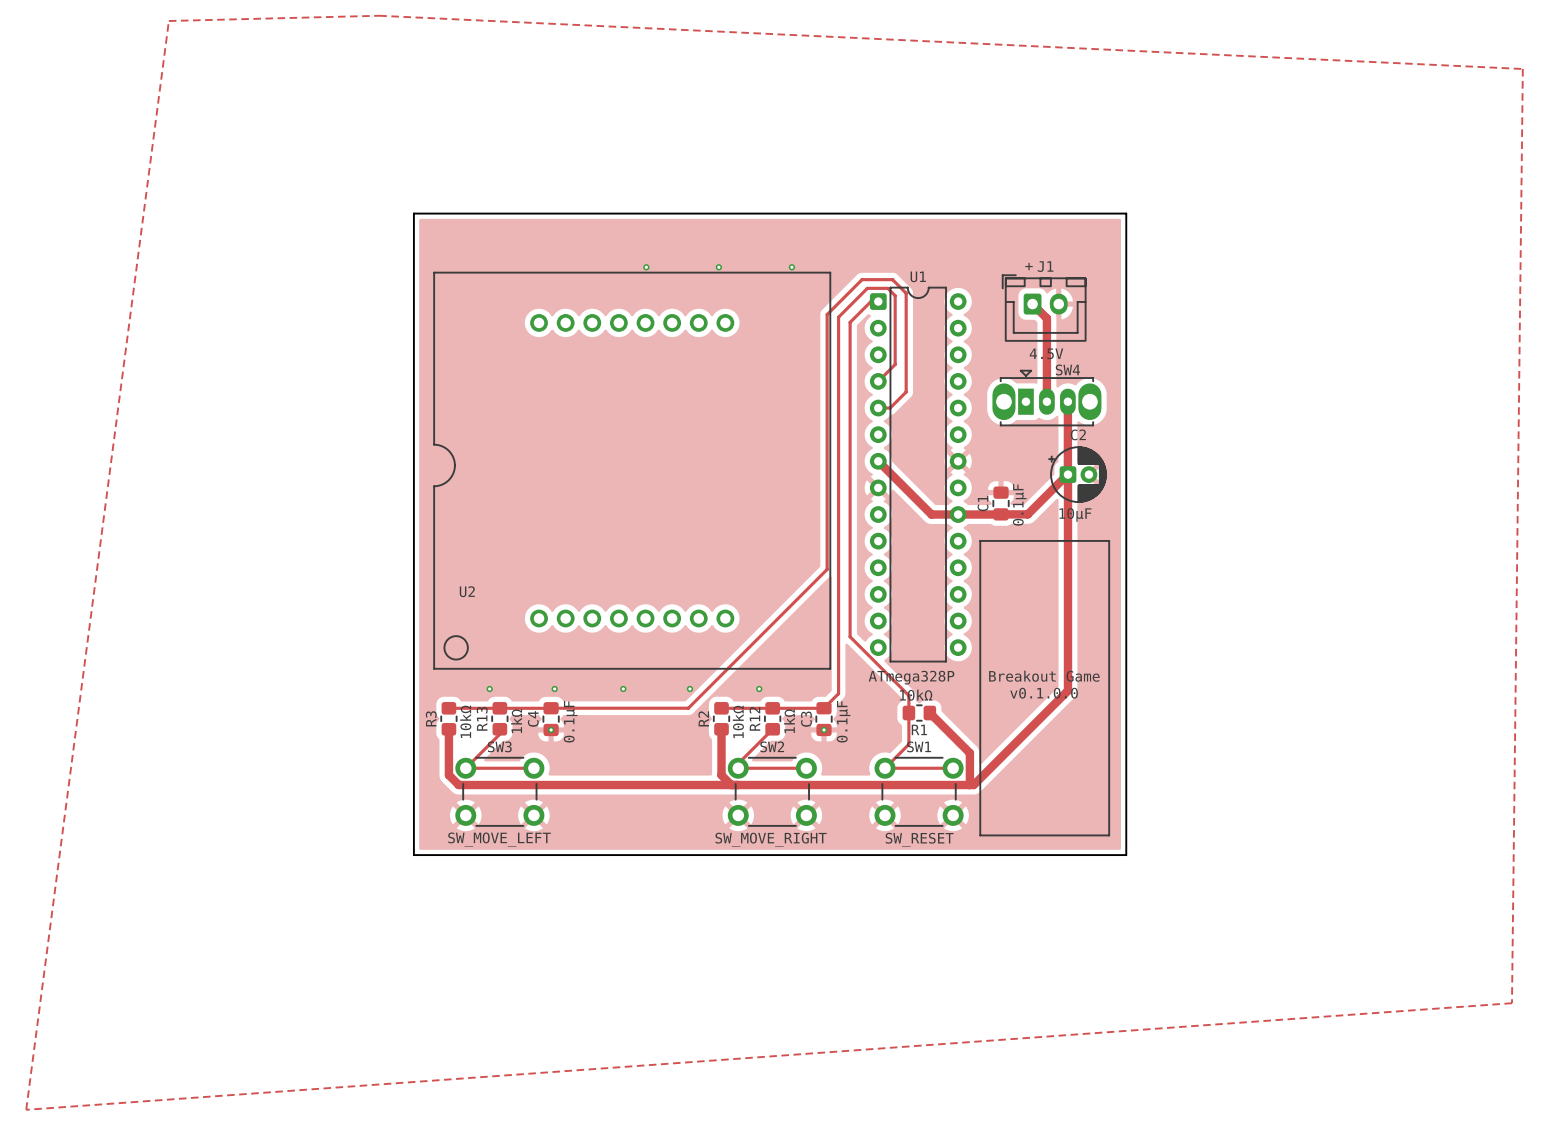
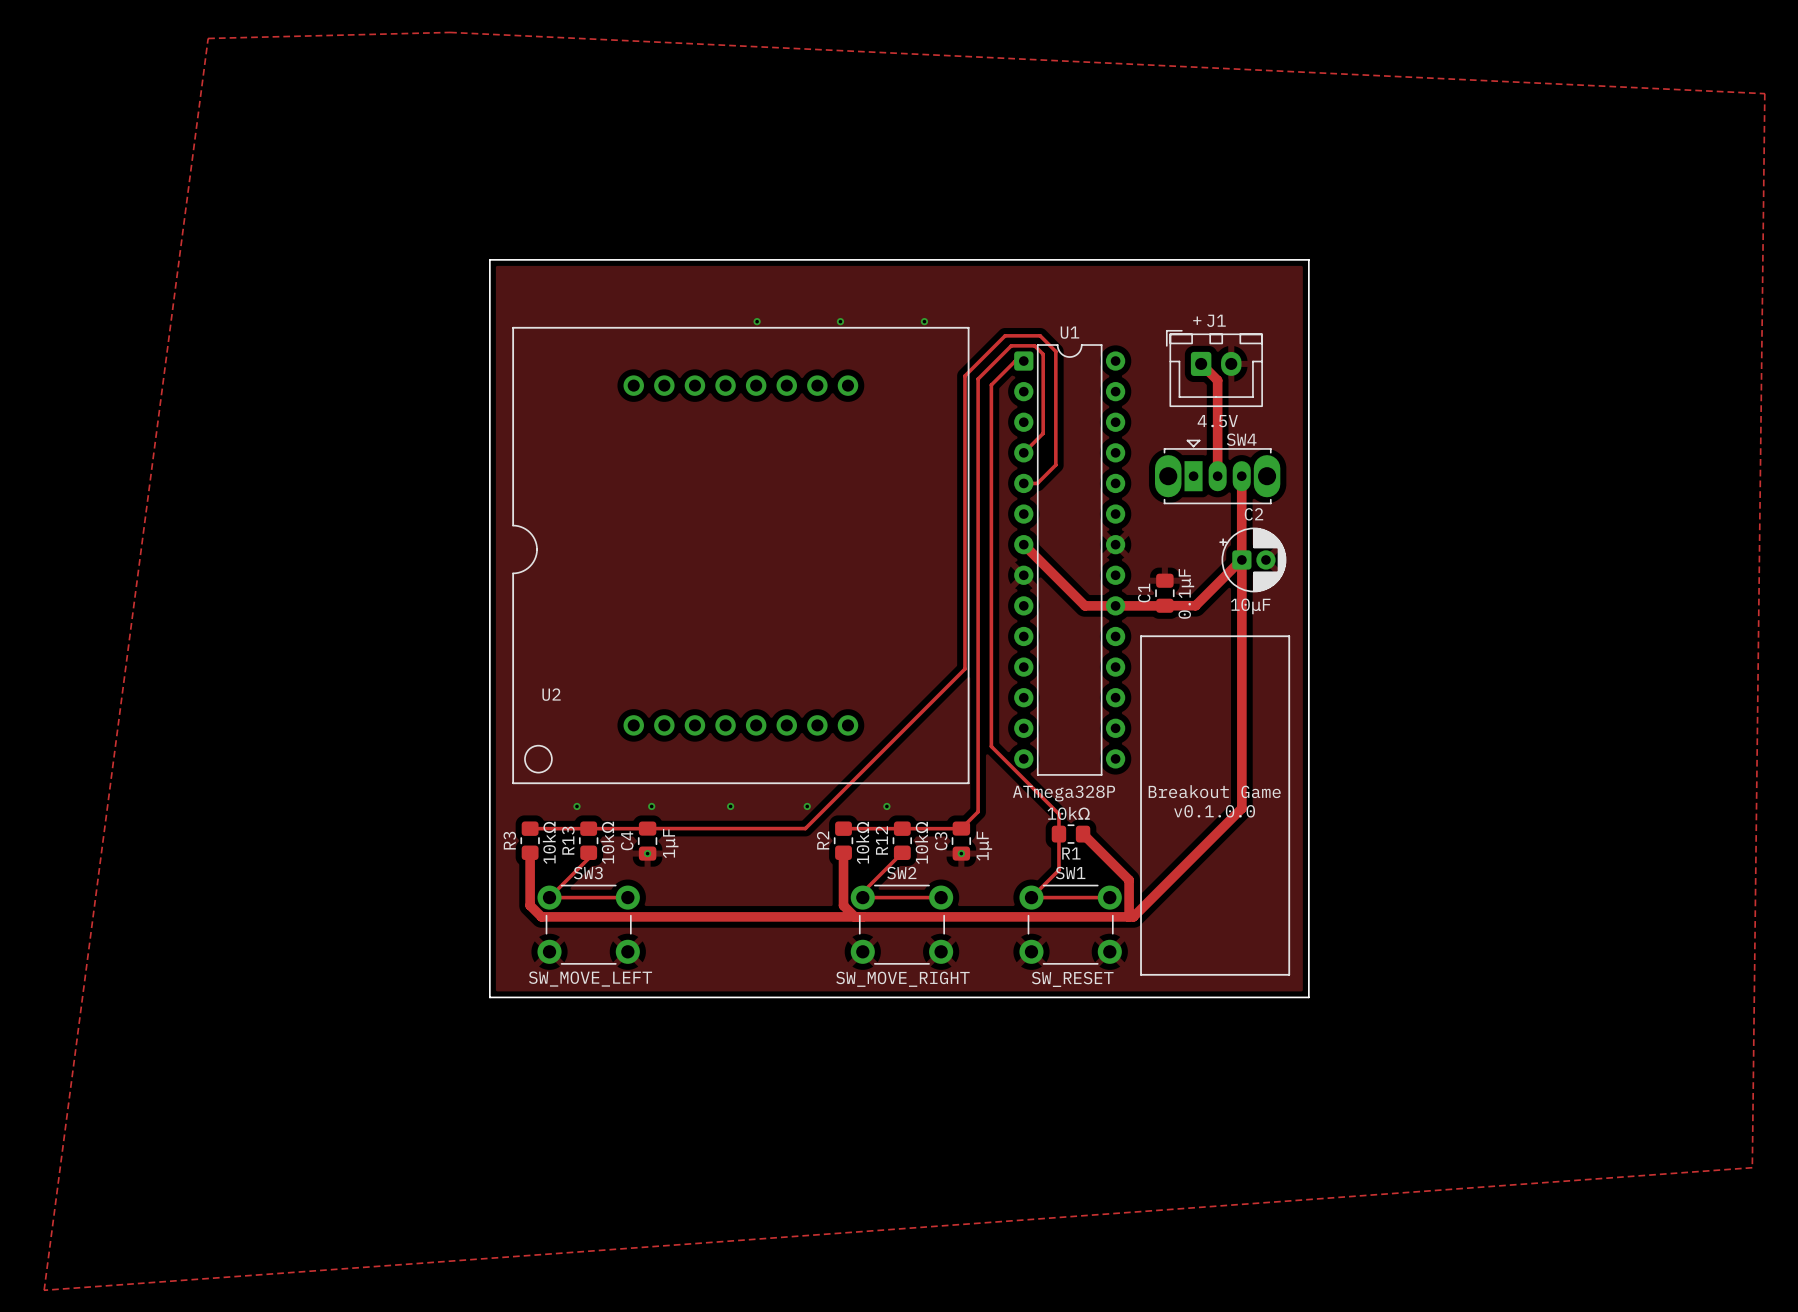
text: 1kΩ (516, 721) -> 10kΩ (607, 842)
text: 0.1μF (570, 721) -> 1μF (670, 843)
text: 1kΩ (789, 721) -> 10kΩ (921, 842)
text: 0.1μF (843, 721) -> 1μF (984, 846)

